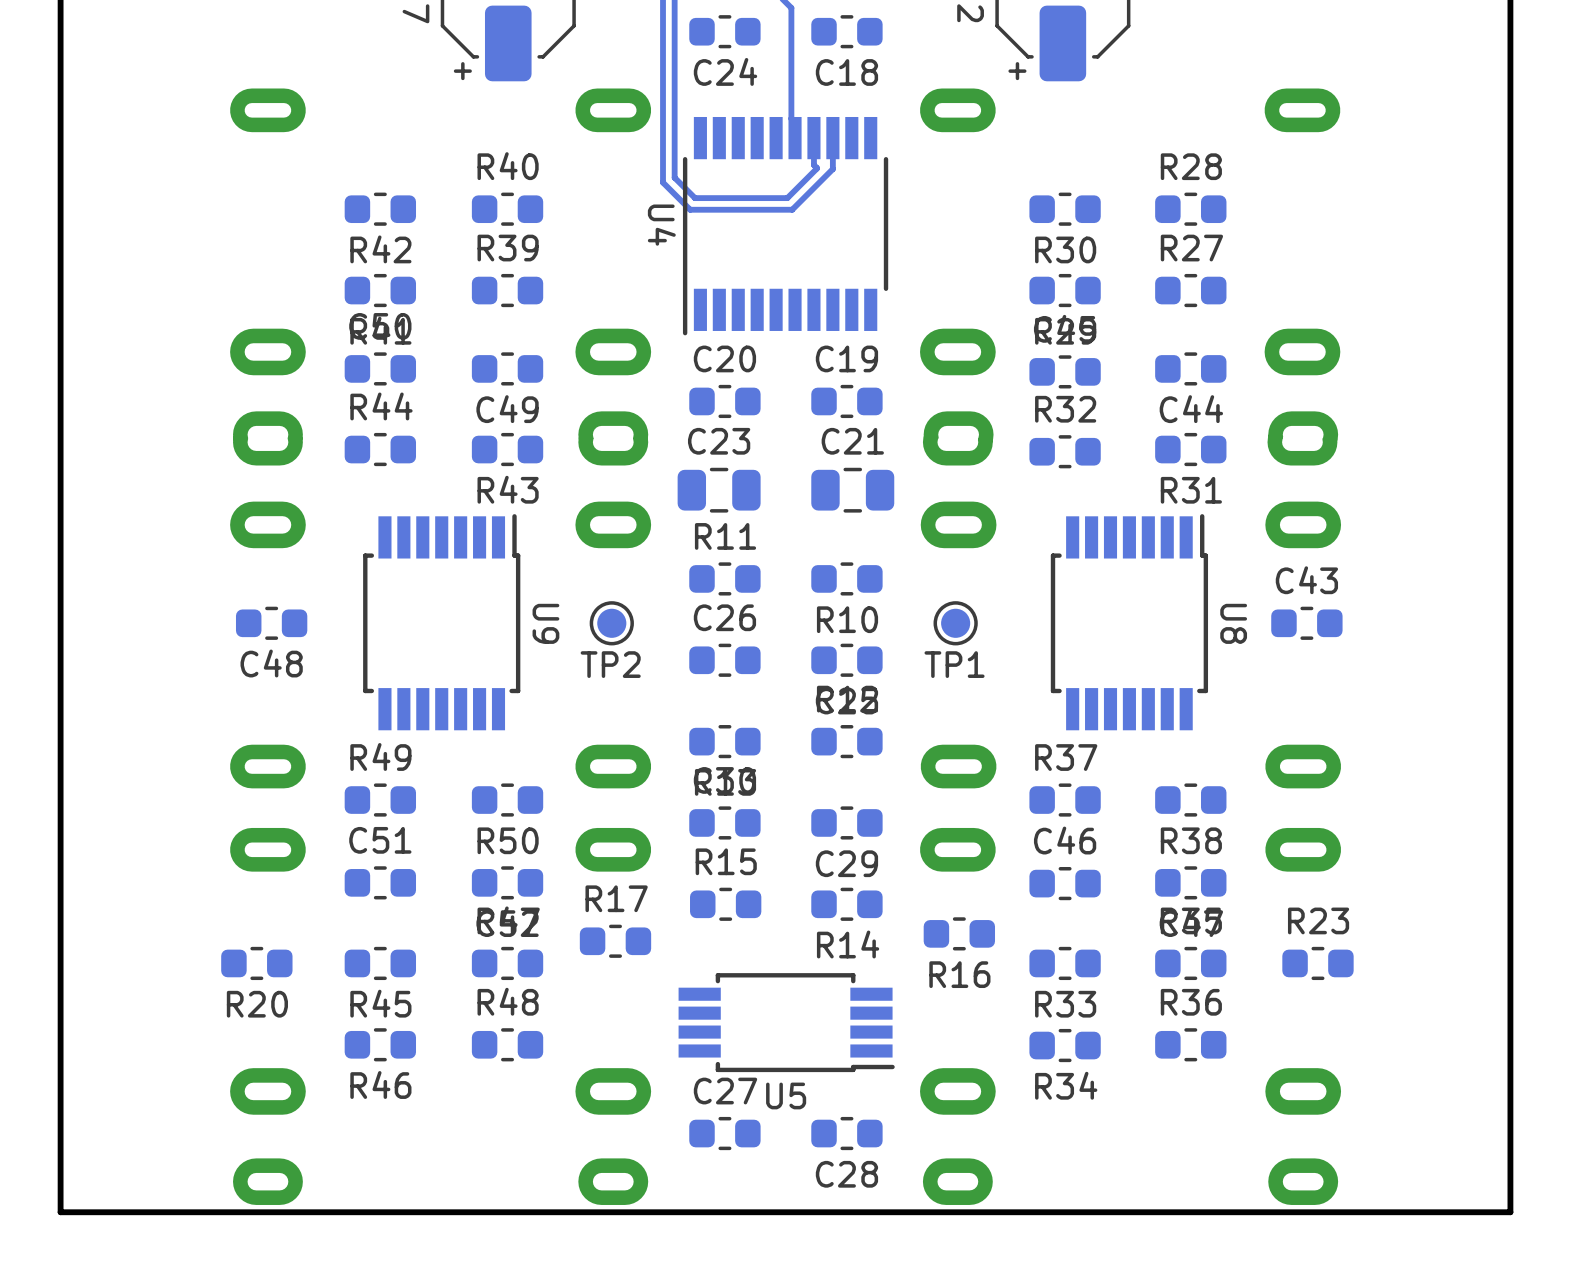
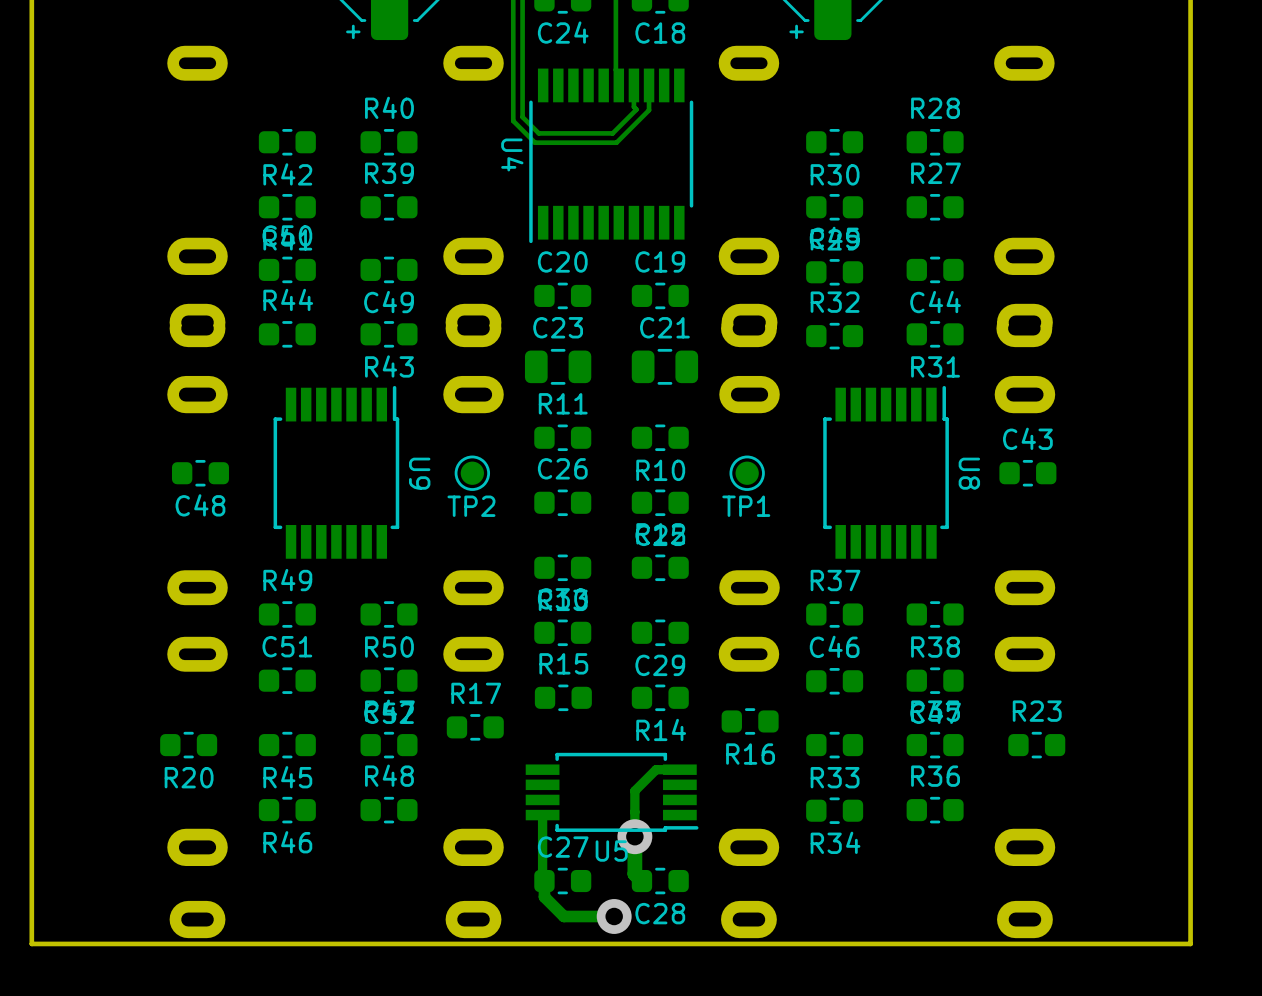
track: none -> (679, 769) (656, 769) (634, 790) (634, 873) (641, 881)
track: none -> (542, 815) (544, 896) (563, 916) (614, 916)
via: none -> (634, 836)
via: none -> (614, 916)

